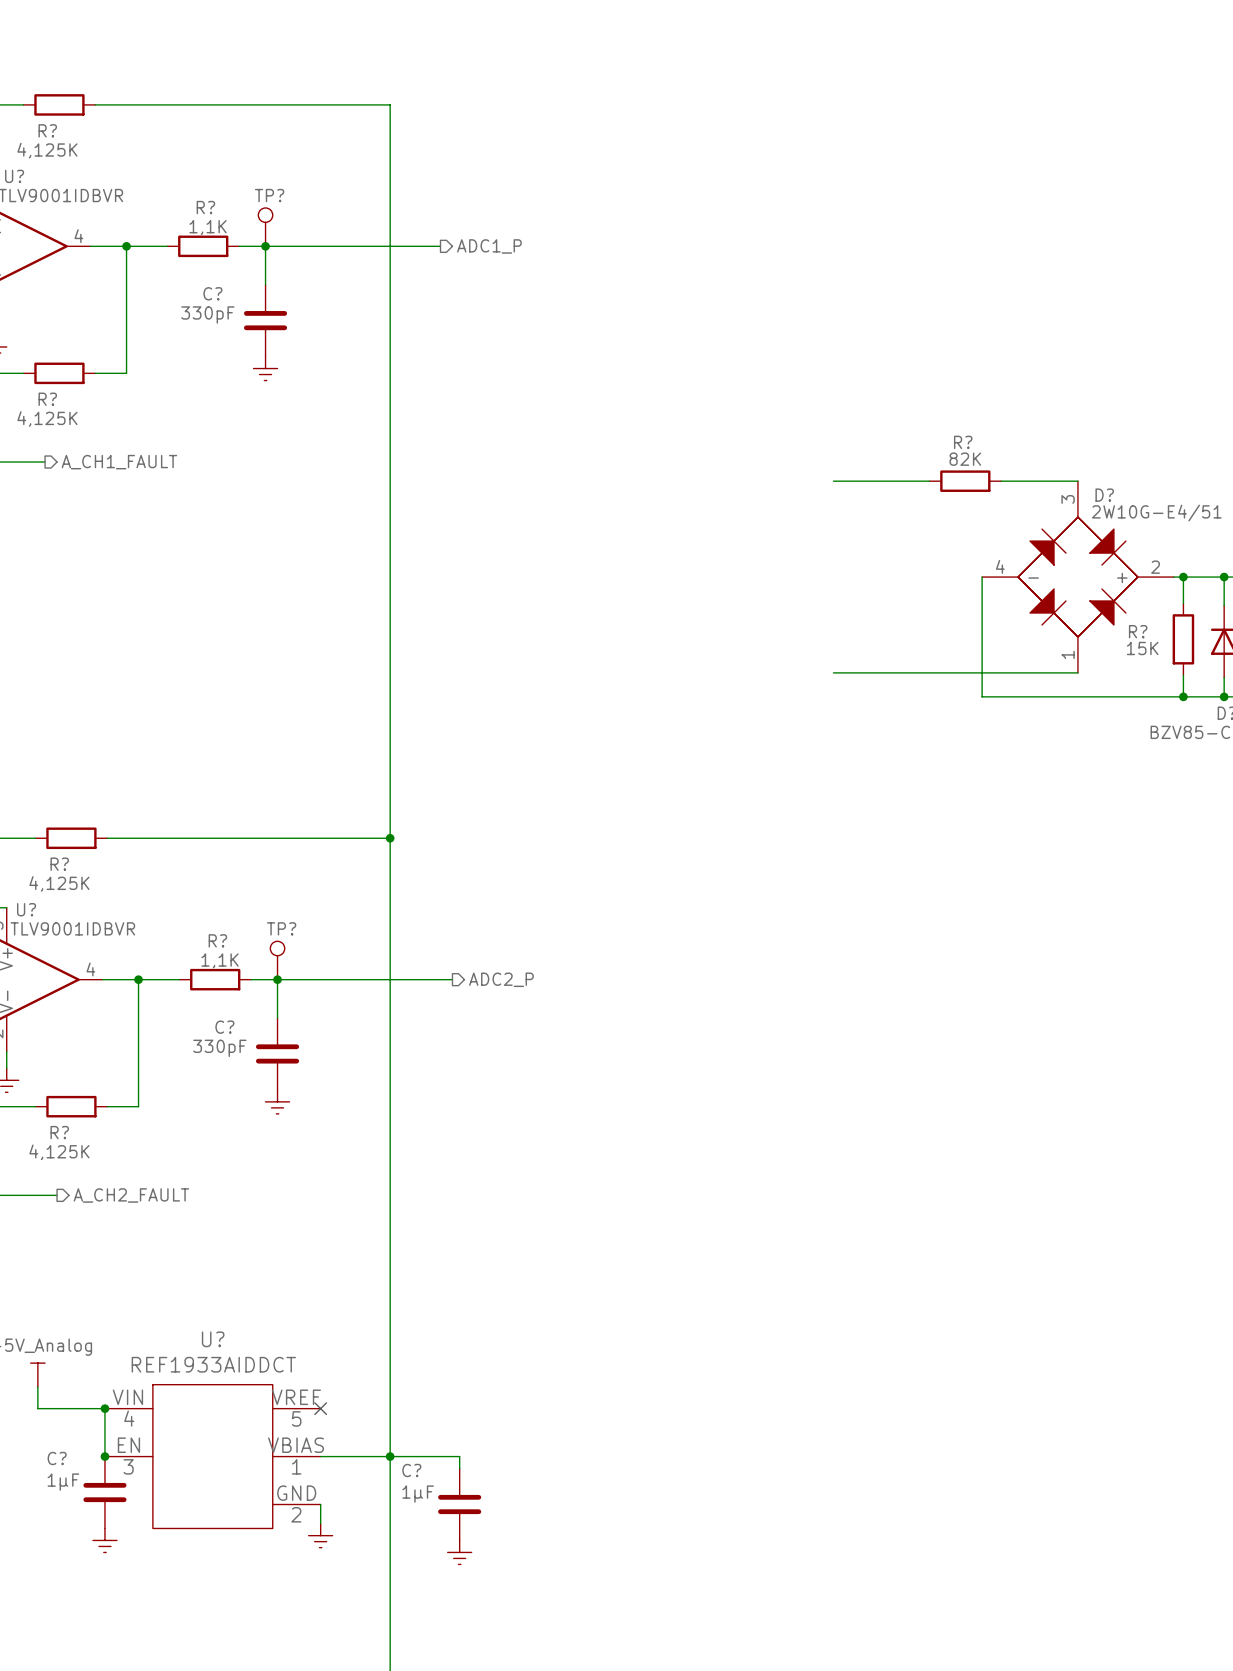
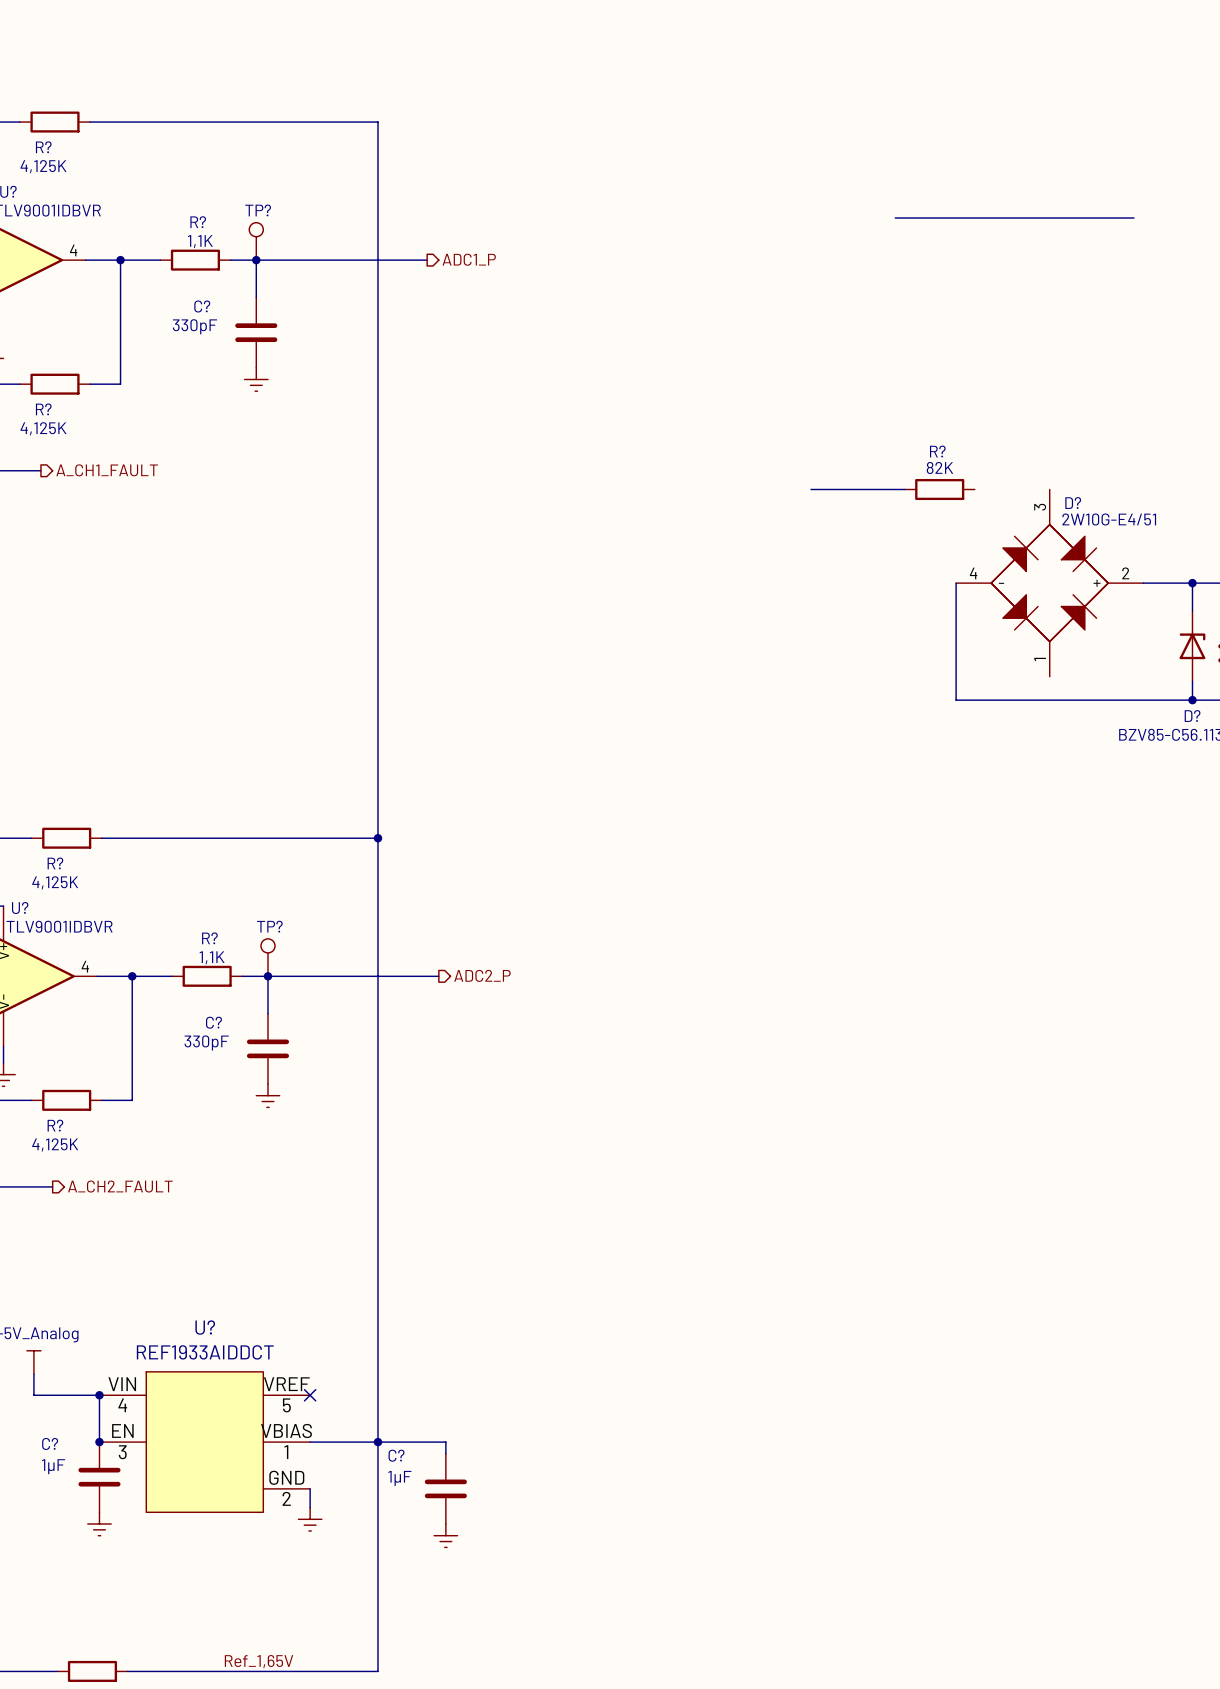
wire: none -> (895, 218) (1133, 218)
wire: (1001, 481) (1077, 481) -> none
wire: (1183, 577) (1183, 603) -> none
junction: (1183, 577) -> none
R?: 15K (1183, 639) -> none
wire: (833, 672) (1077, 672) -> none
wire: (1183, 675) (1183, 696) -> none
junction: (1183, 696) -> none

